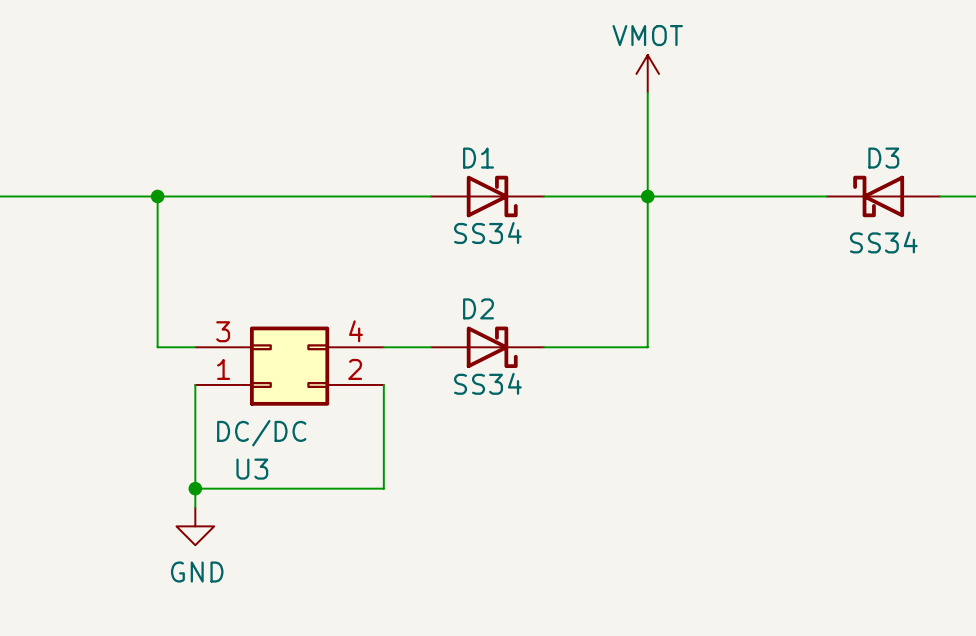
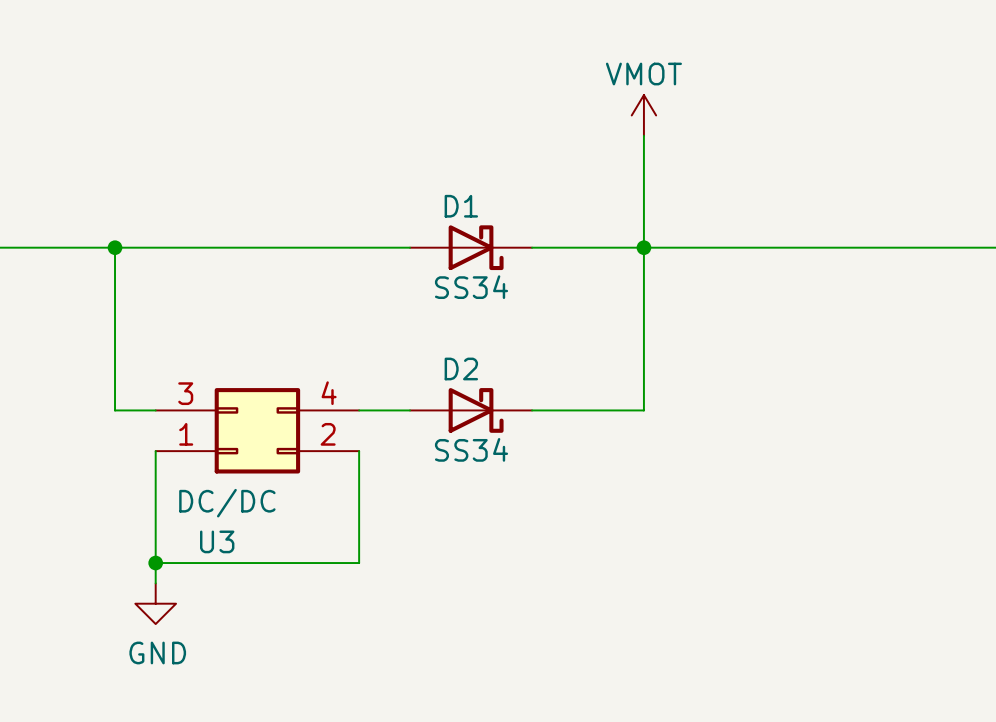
D3: SS34 (883, 196) -> none

